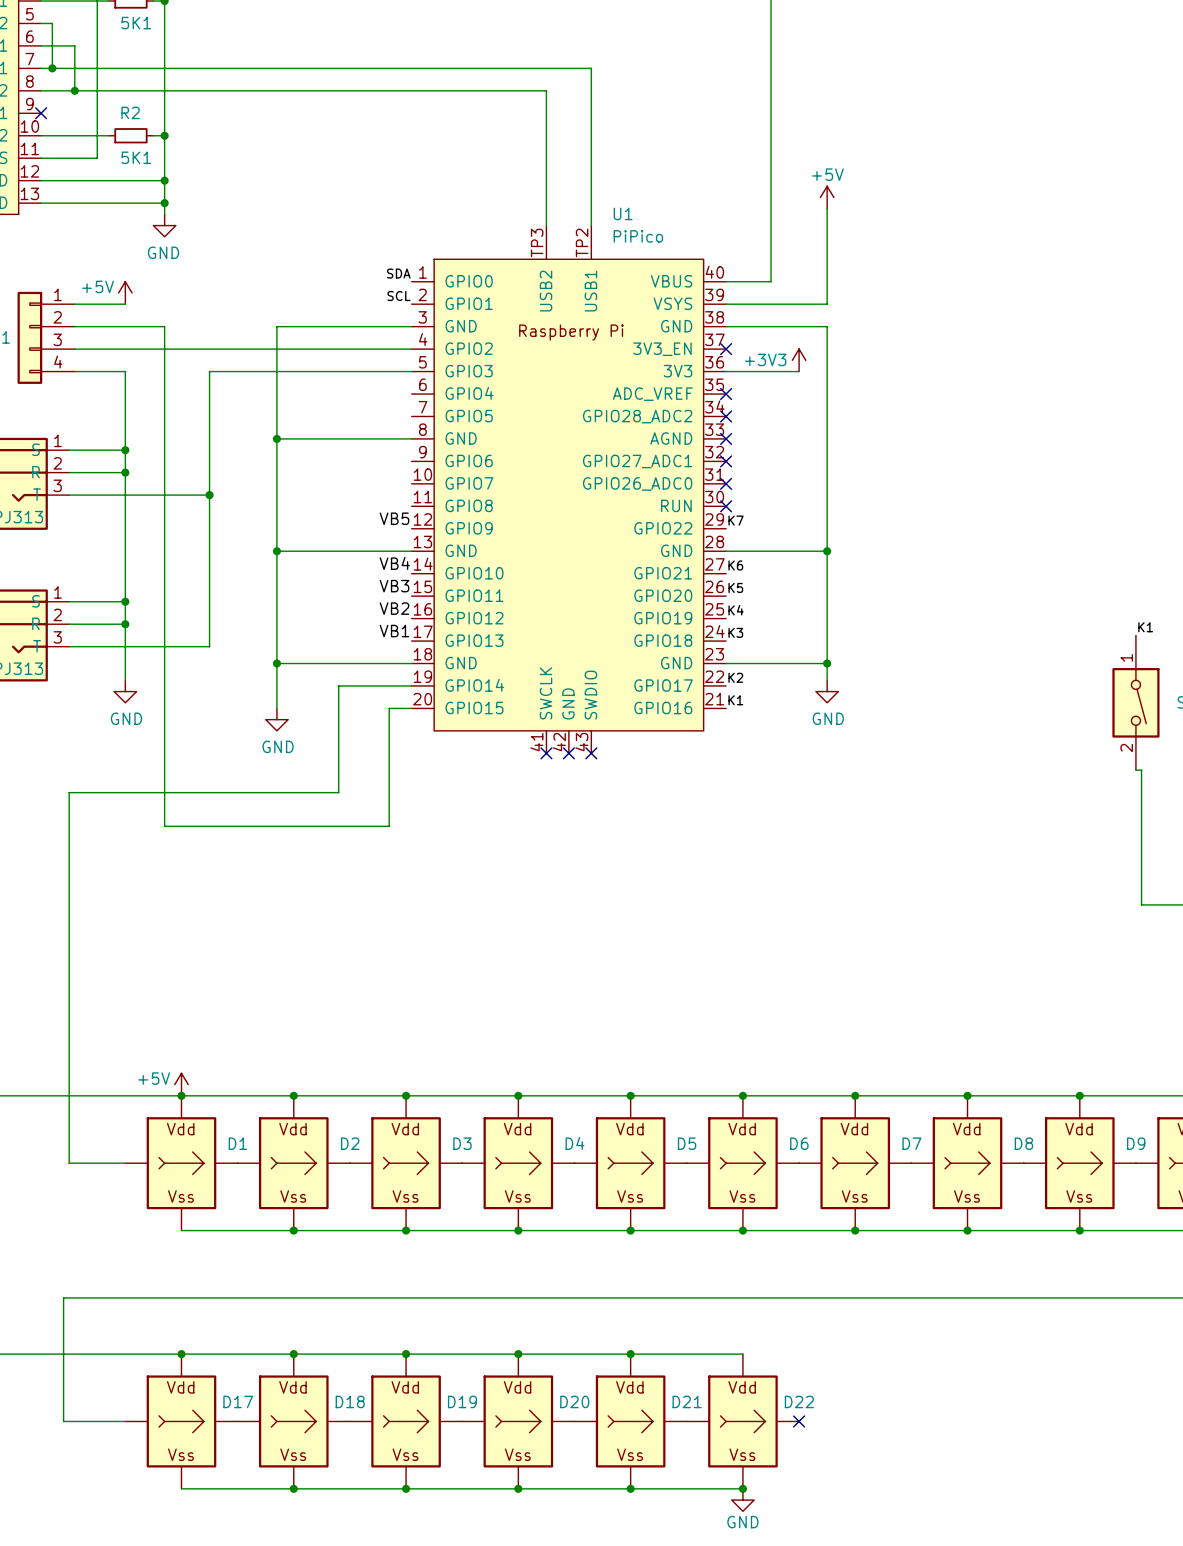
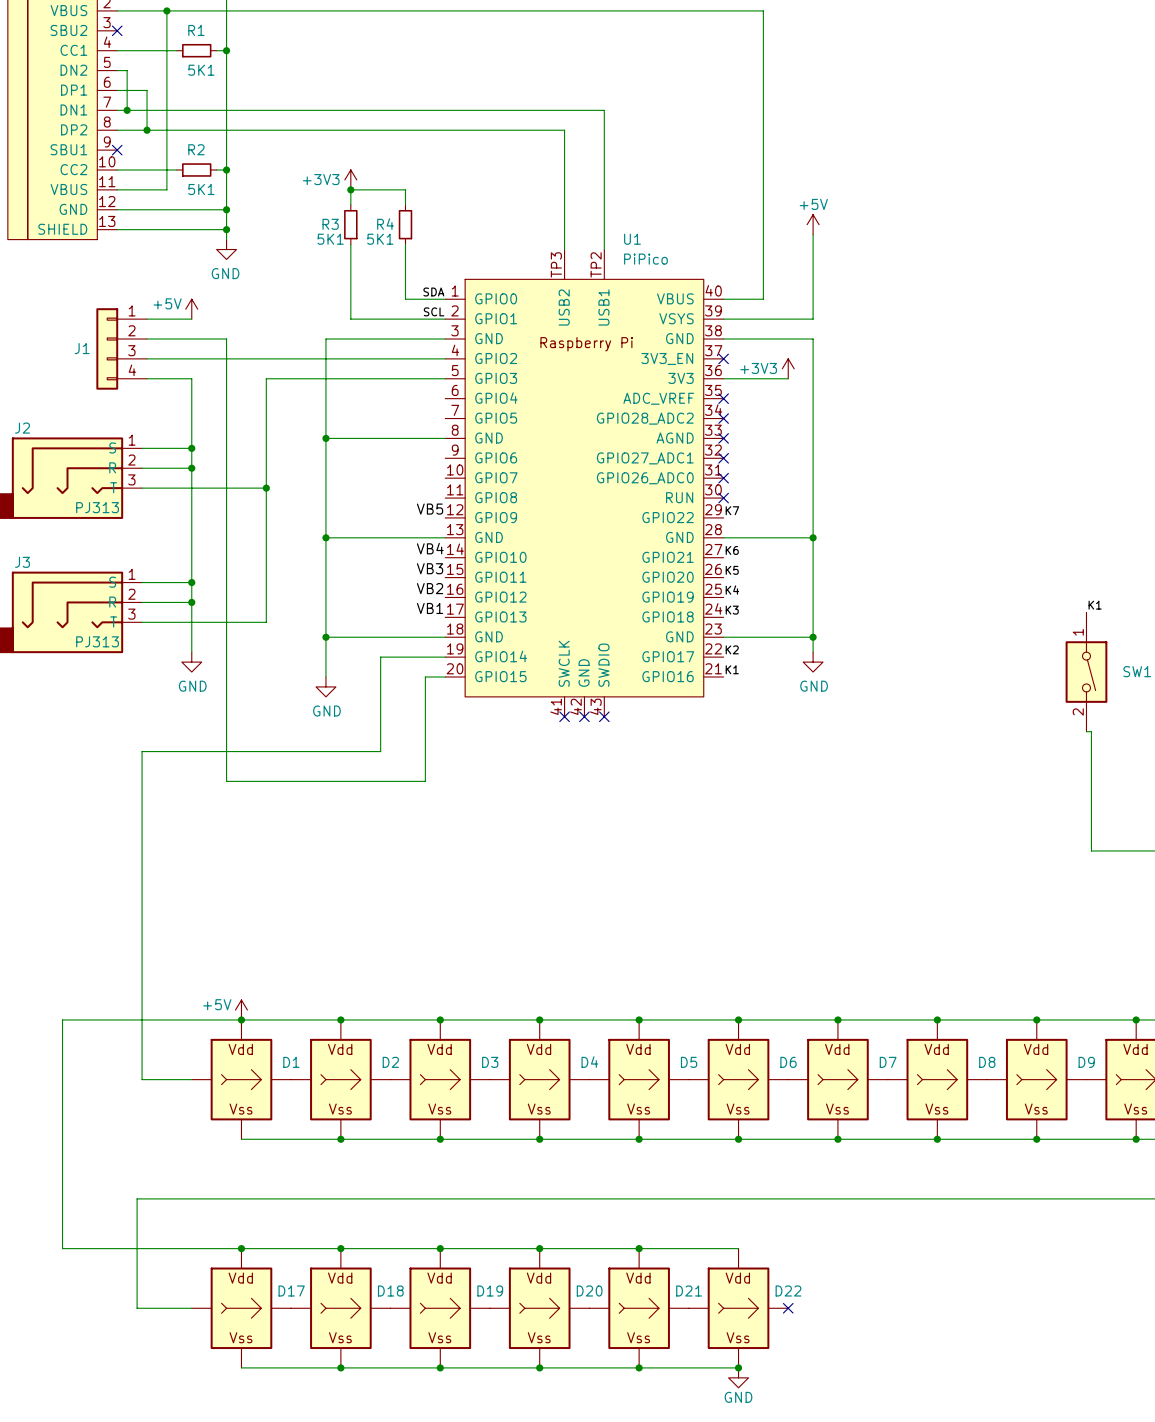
power symbol: none -> +3V3 (350, 179)
junction: none -> (350, 189)
wire: none -> (350, 204) (350, 189) (405, 189) (405, 204)
R3: none -> 5K1 (350, 224)
R4: none -> 5K1 (405, 224)
wire: none -> (350, 244) (350, 319) (445, 319)
wire: none -> (405, 244) (405, 299) (445, 299)

